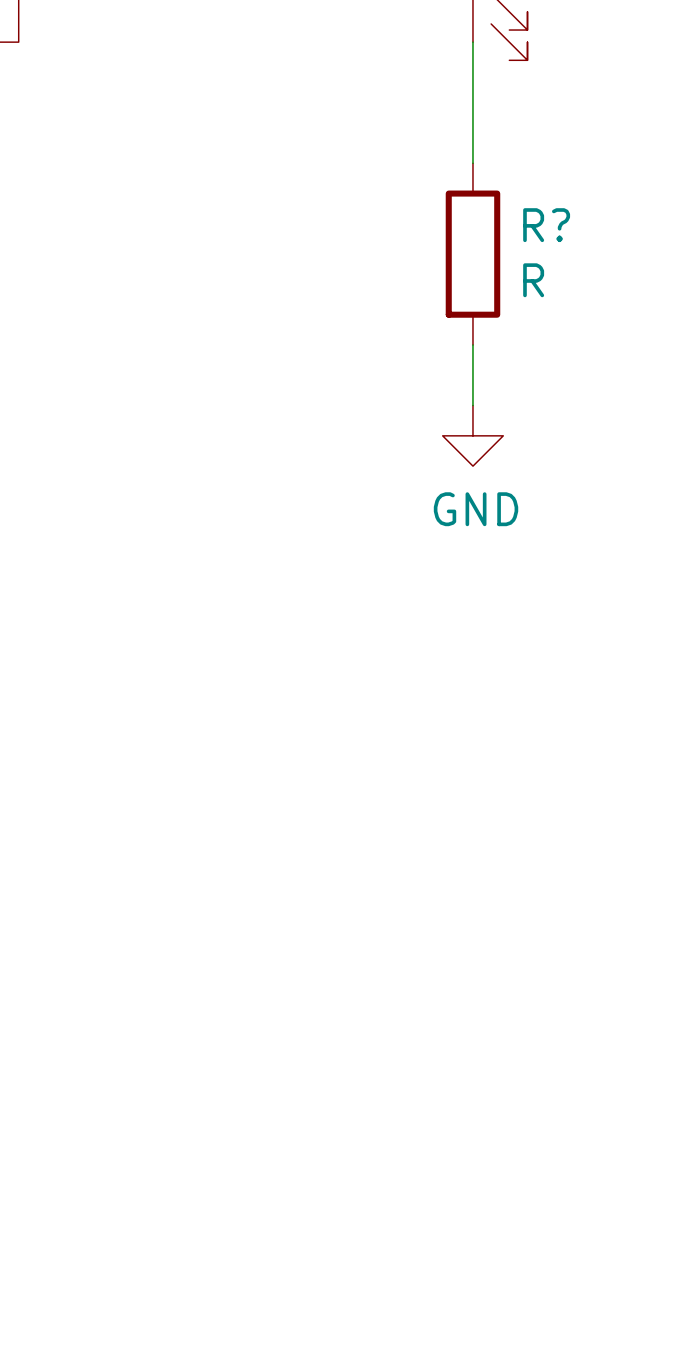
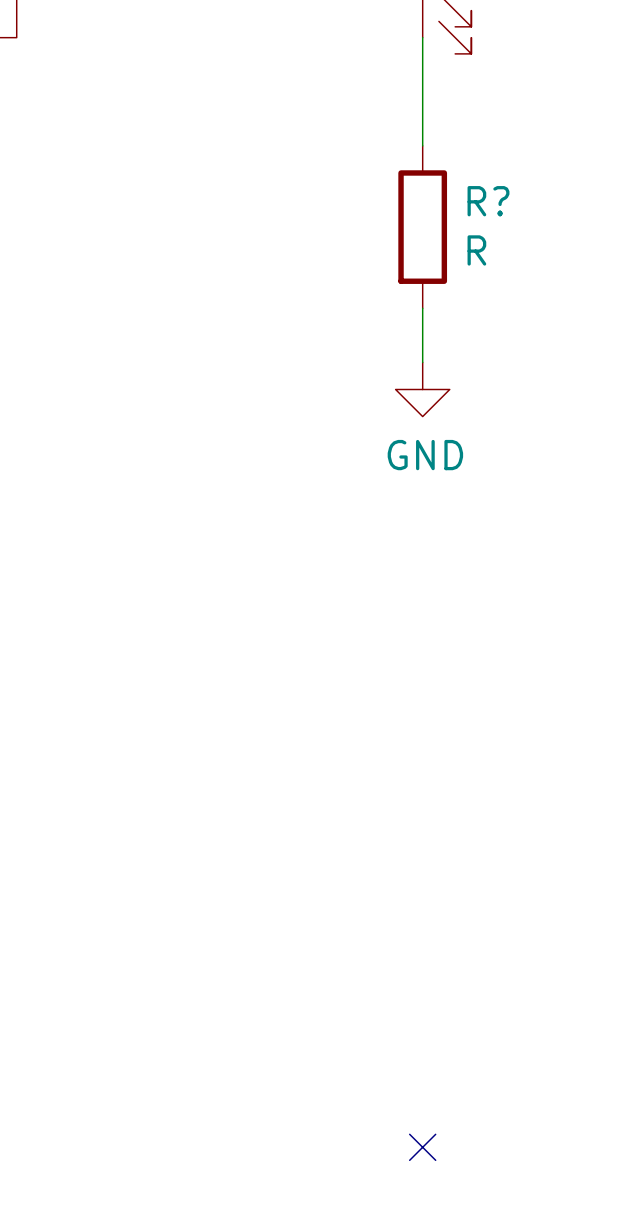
no-connect mark: none -> (422, 1147)

